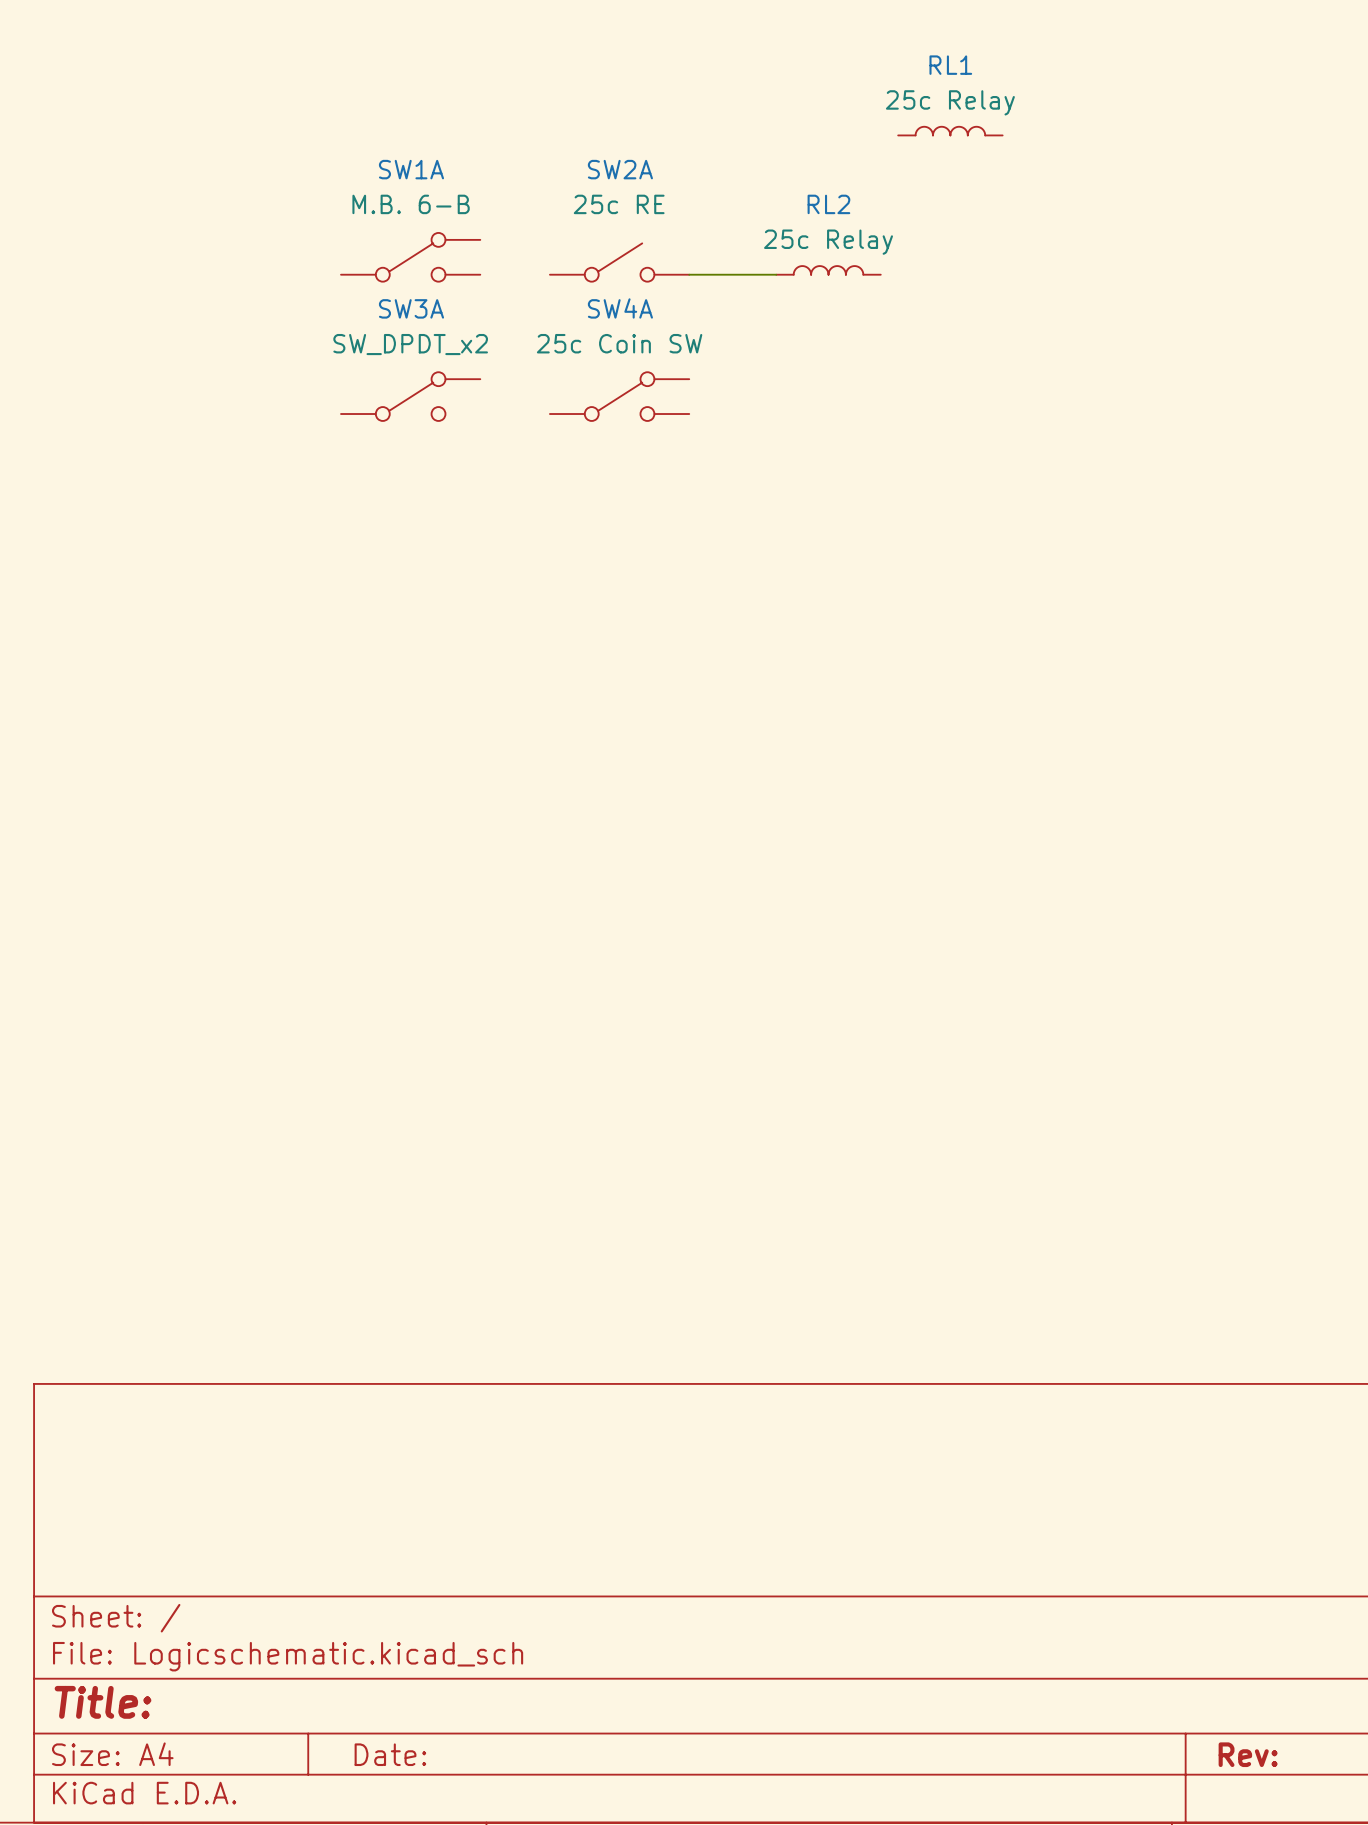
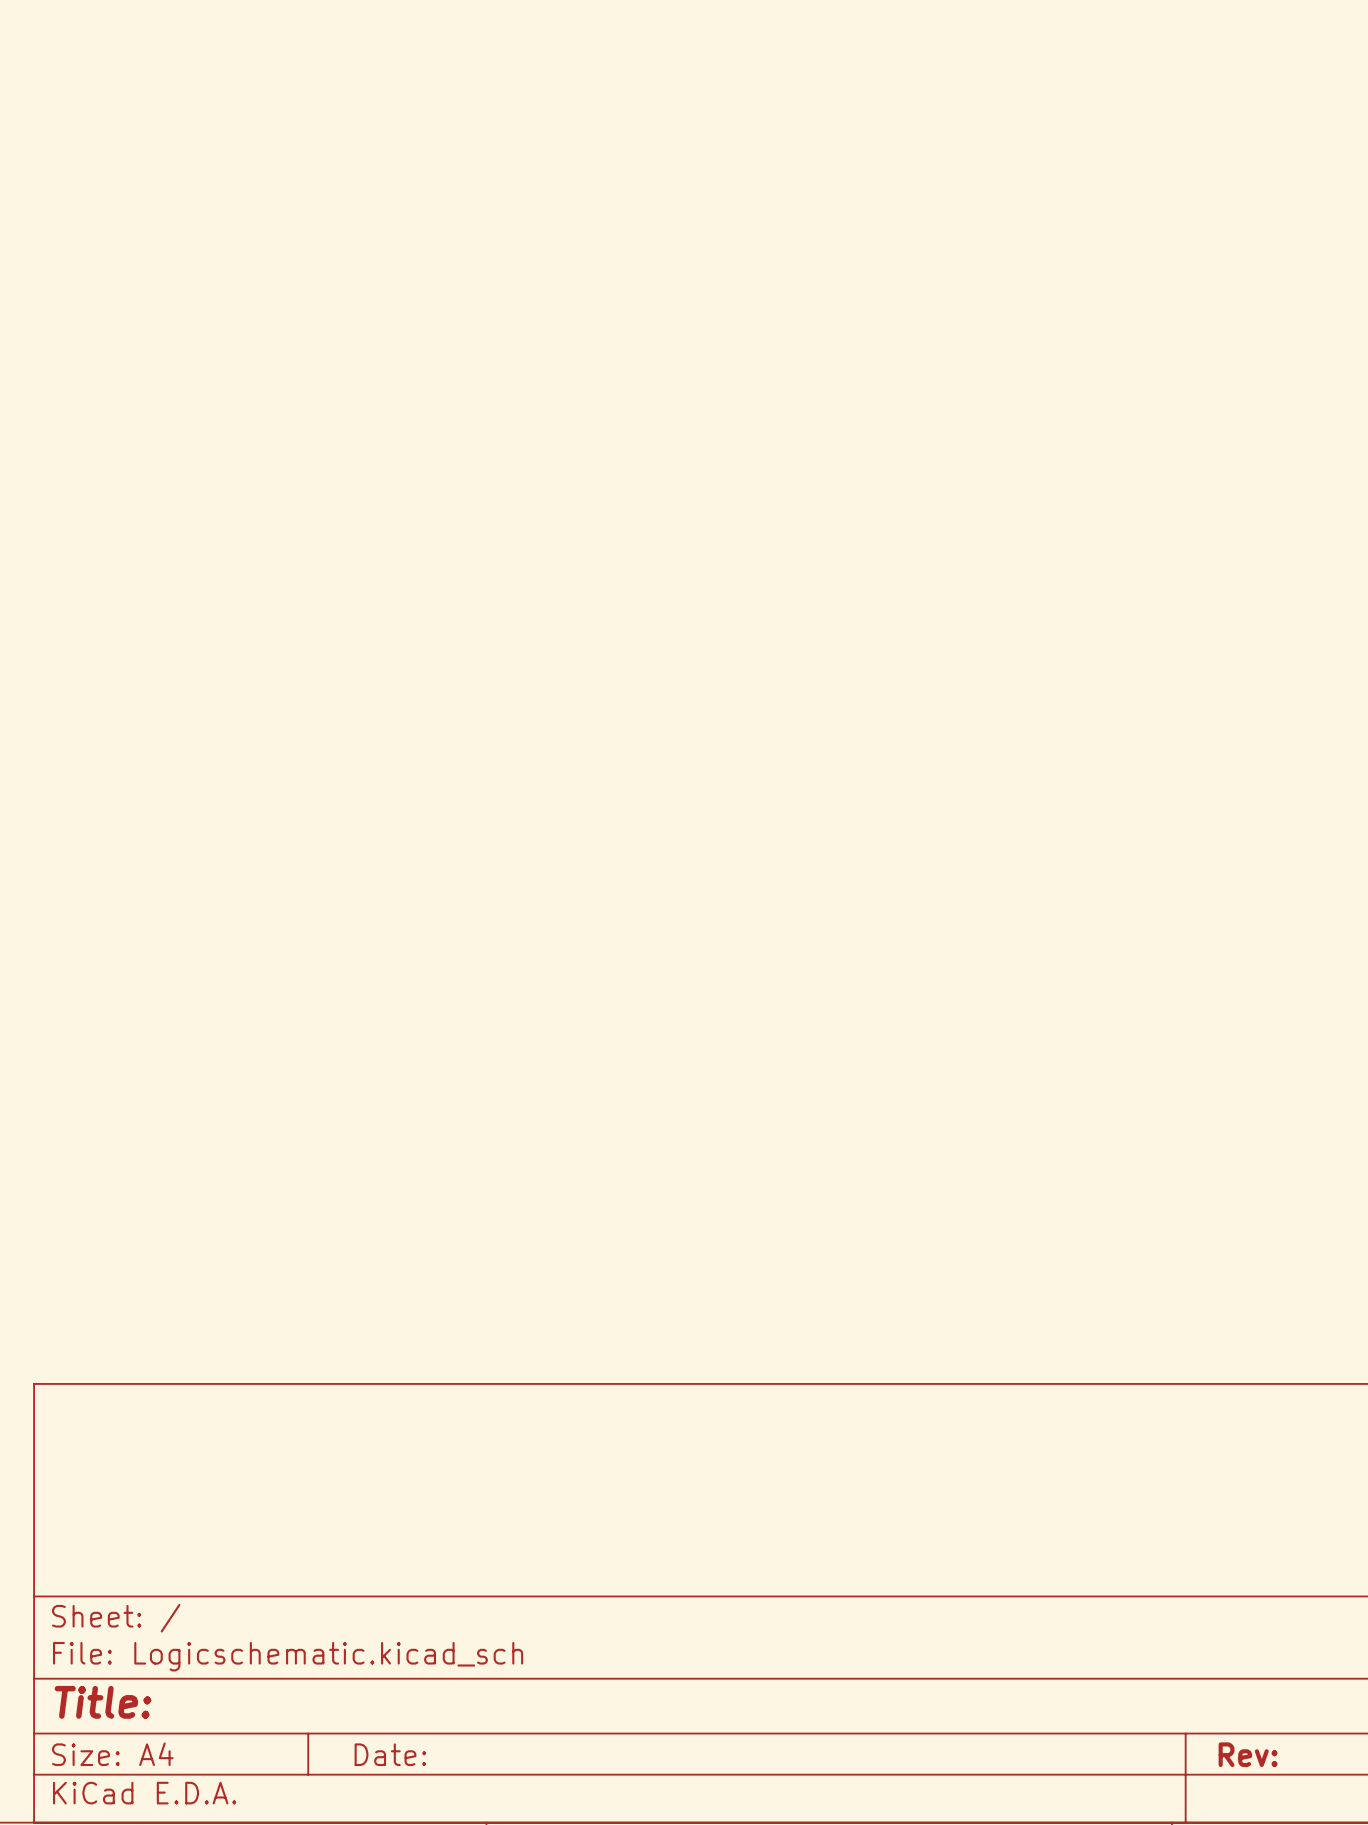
RL1: 25c Relay (950, 131) -> none
SW1A: M.B. 6-B (410, 257) -> none
SW2A: 25c RE (619, 262) -> none
RL2: 25c Relay (828, 270) -> none
wire: (689, 274) (776, 274) -> none
SW3A: SW_DPDT_x2 (410, 396) -> none
SW4A: 25c Coin SW (619, 396) -> none

